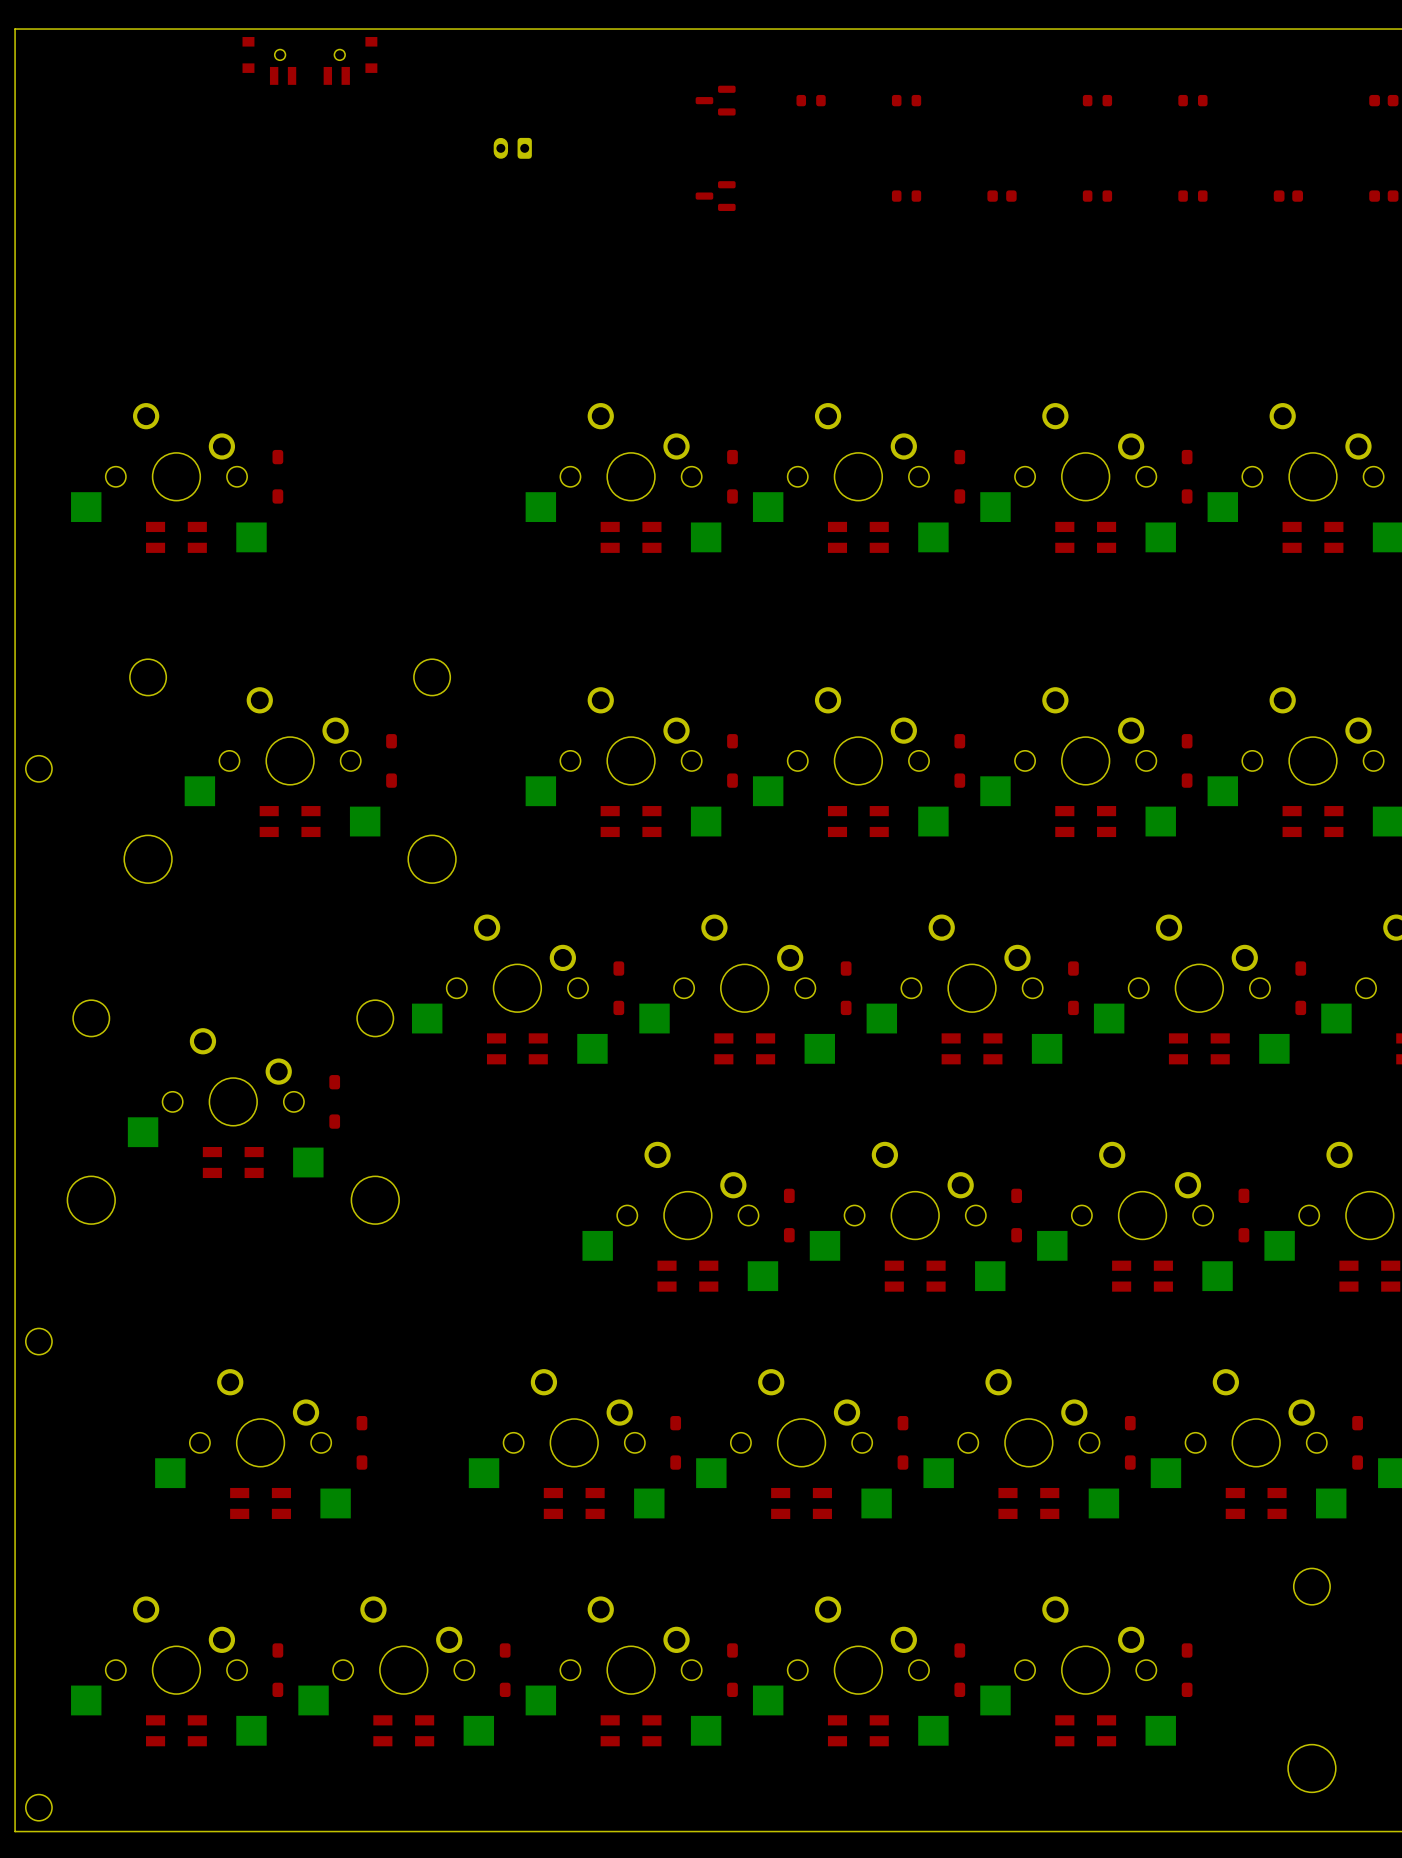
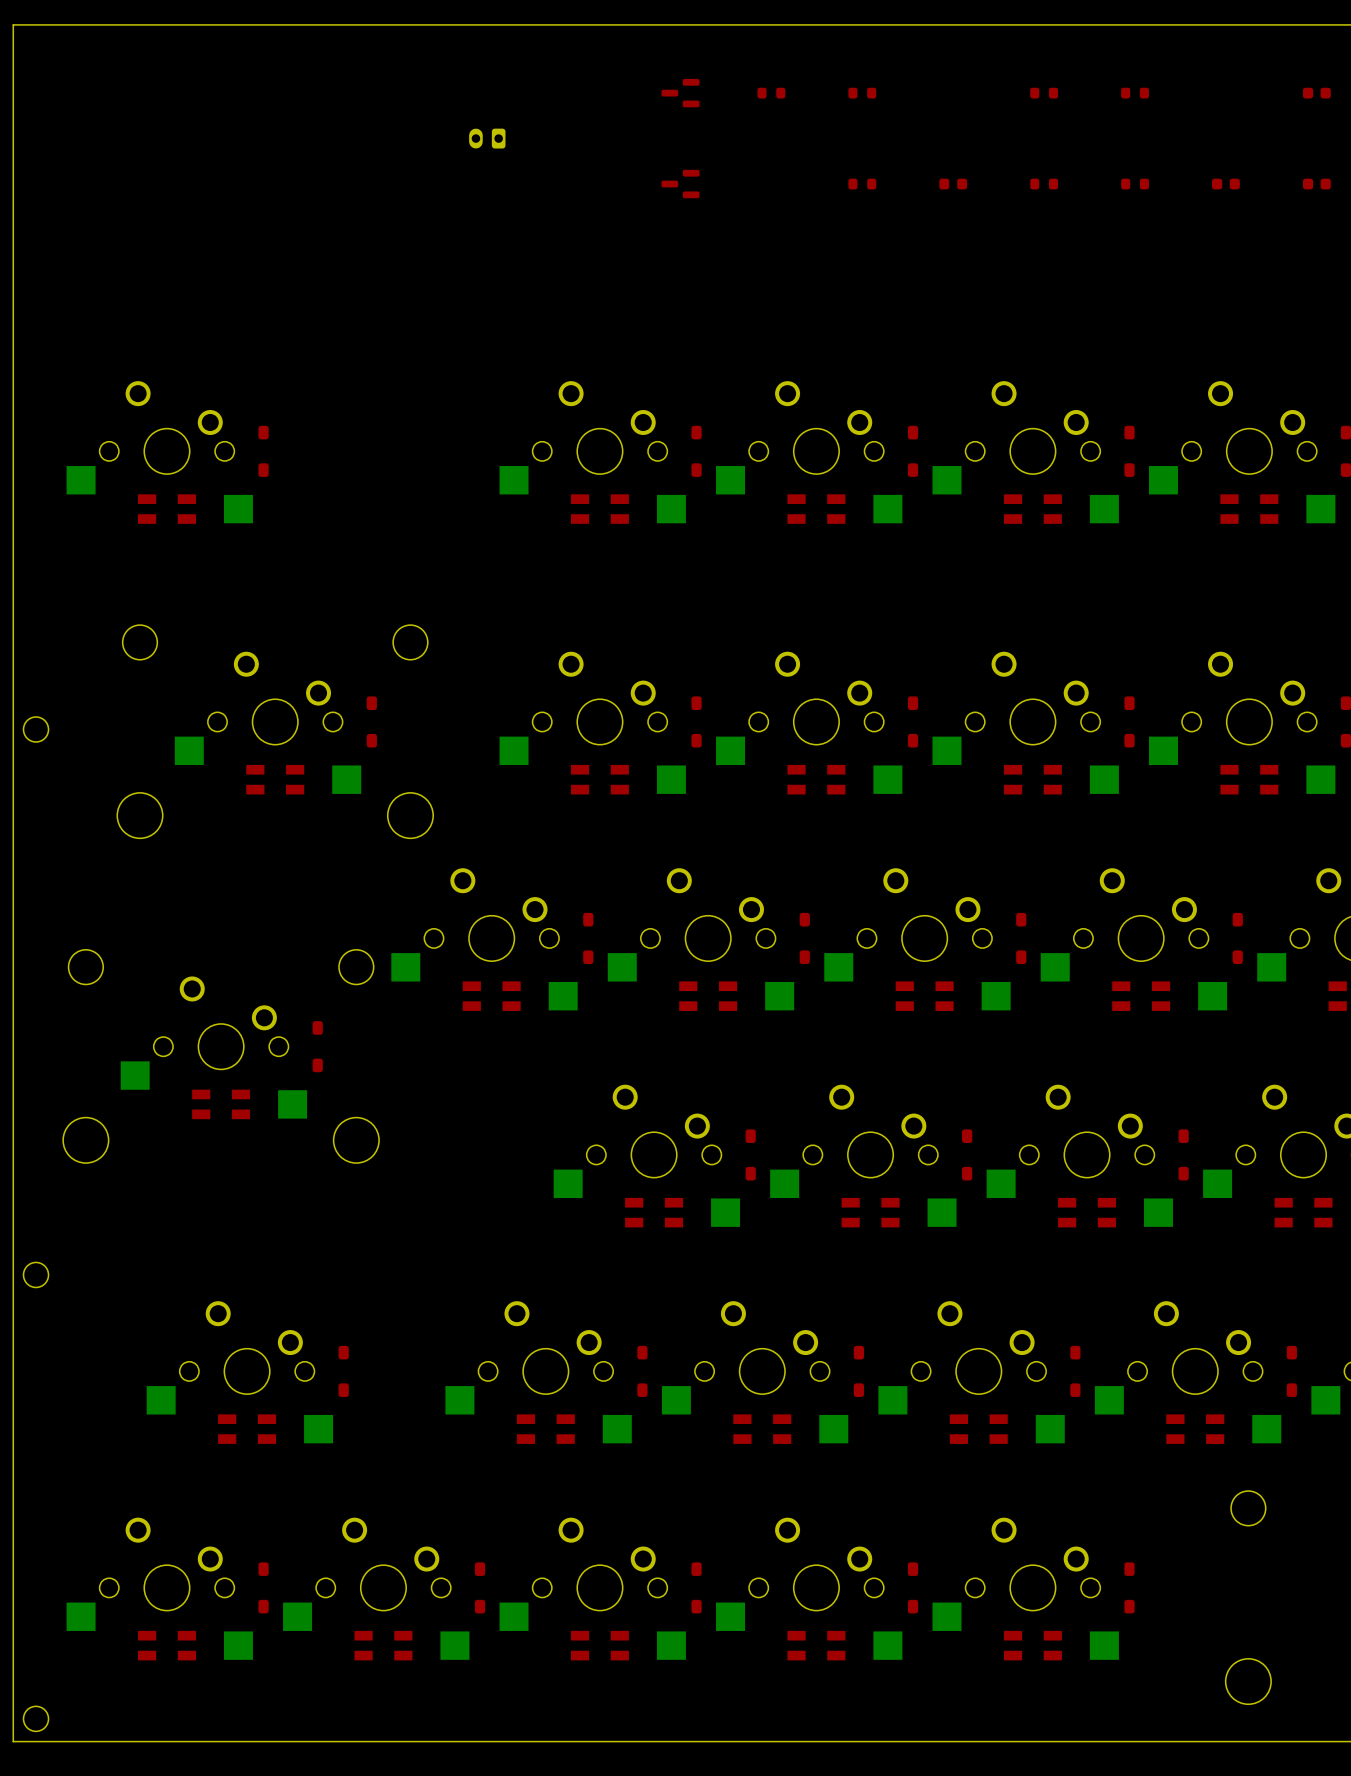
part: (309, 60) -> none

